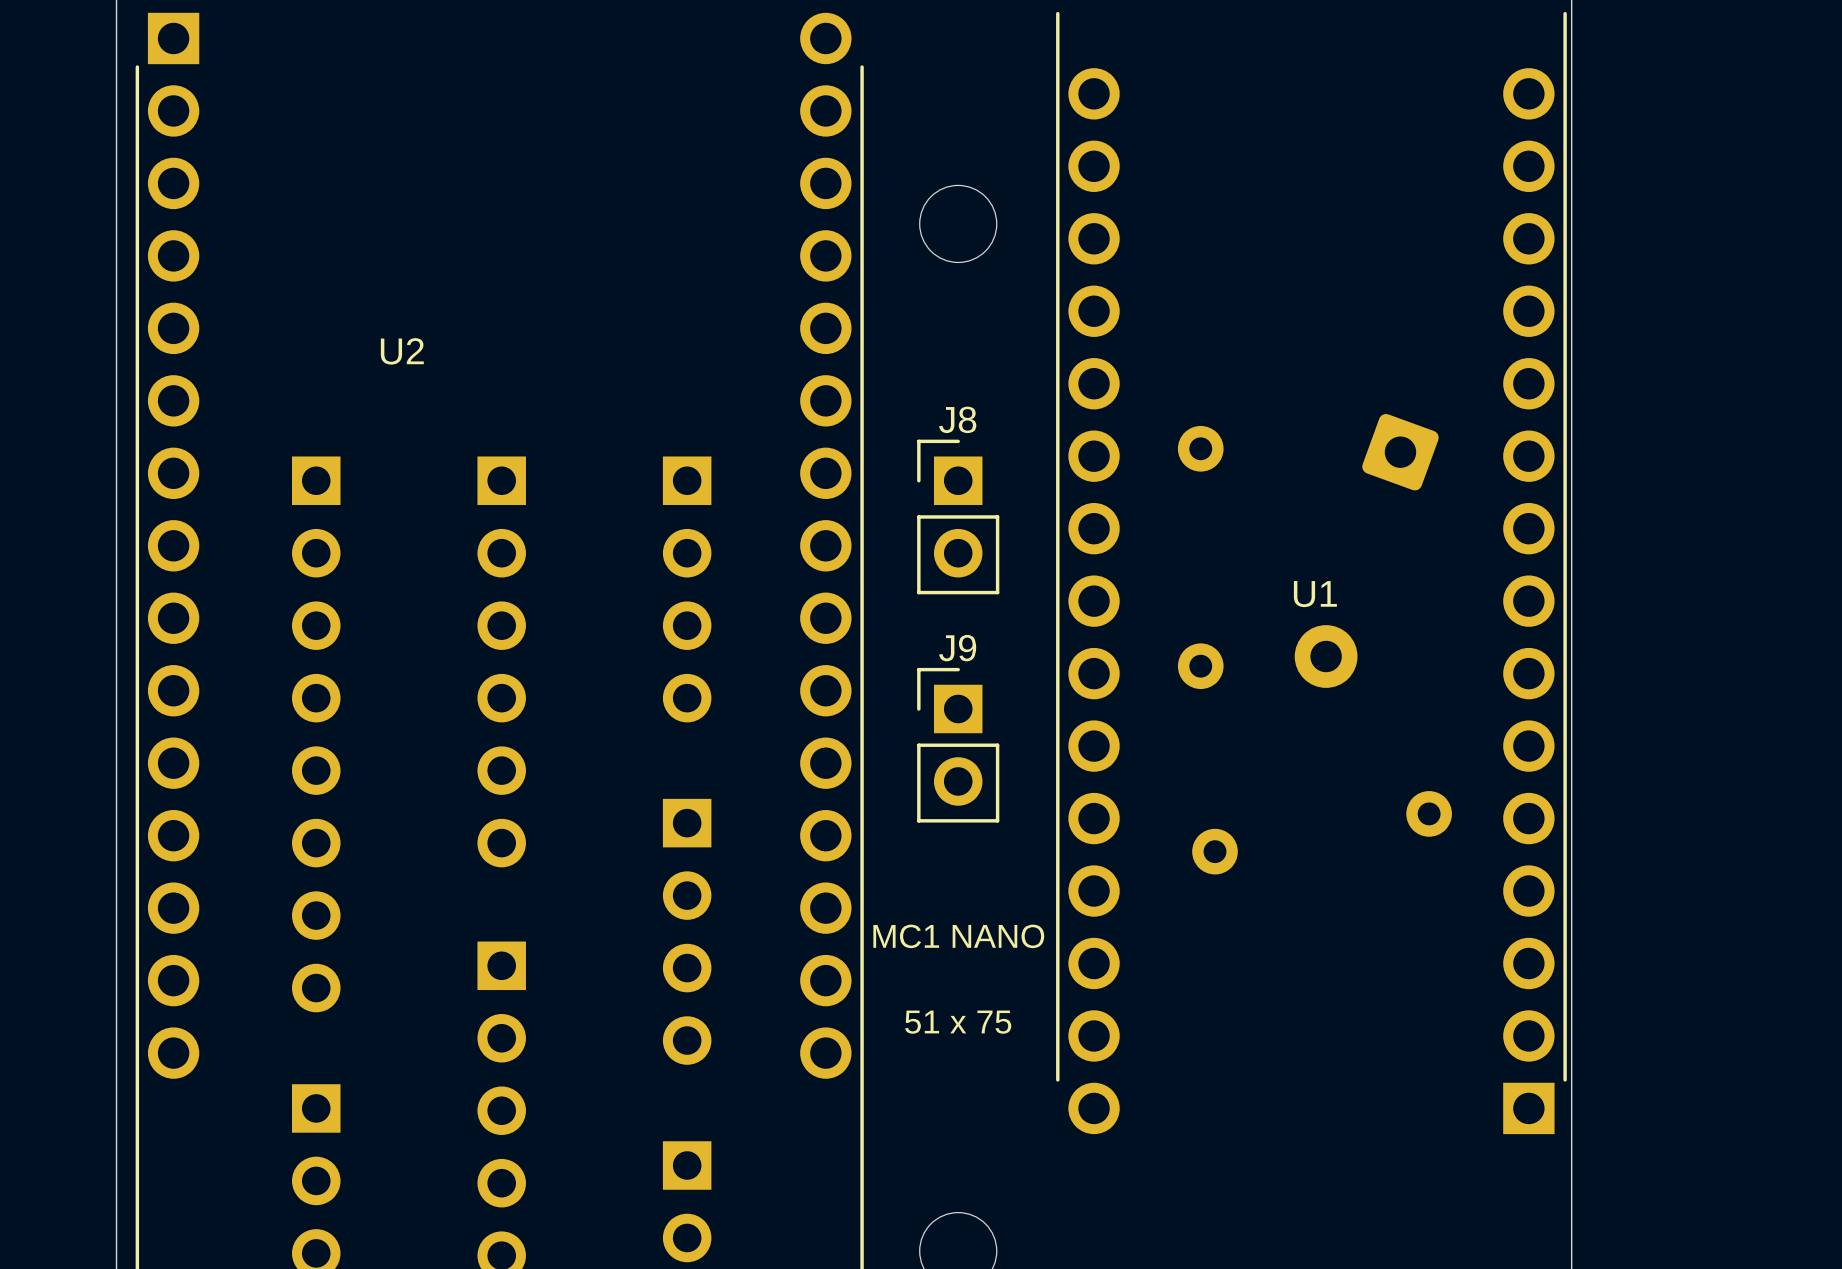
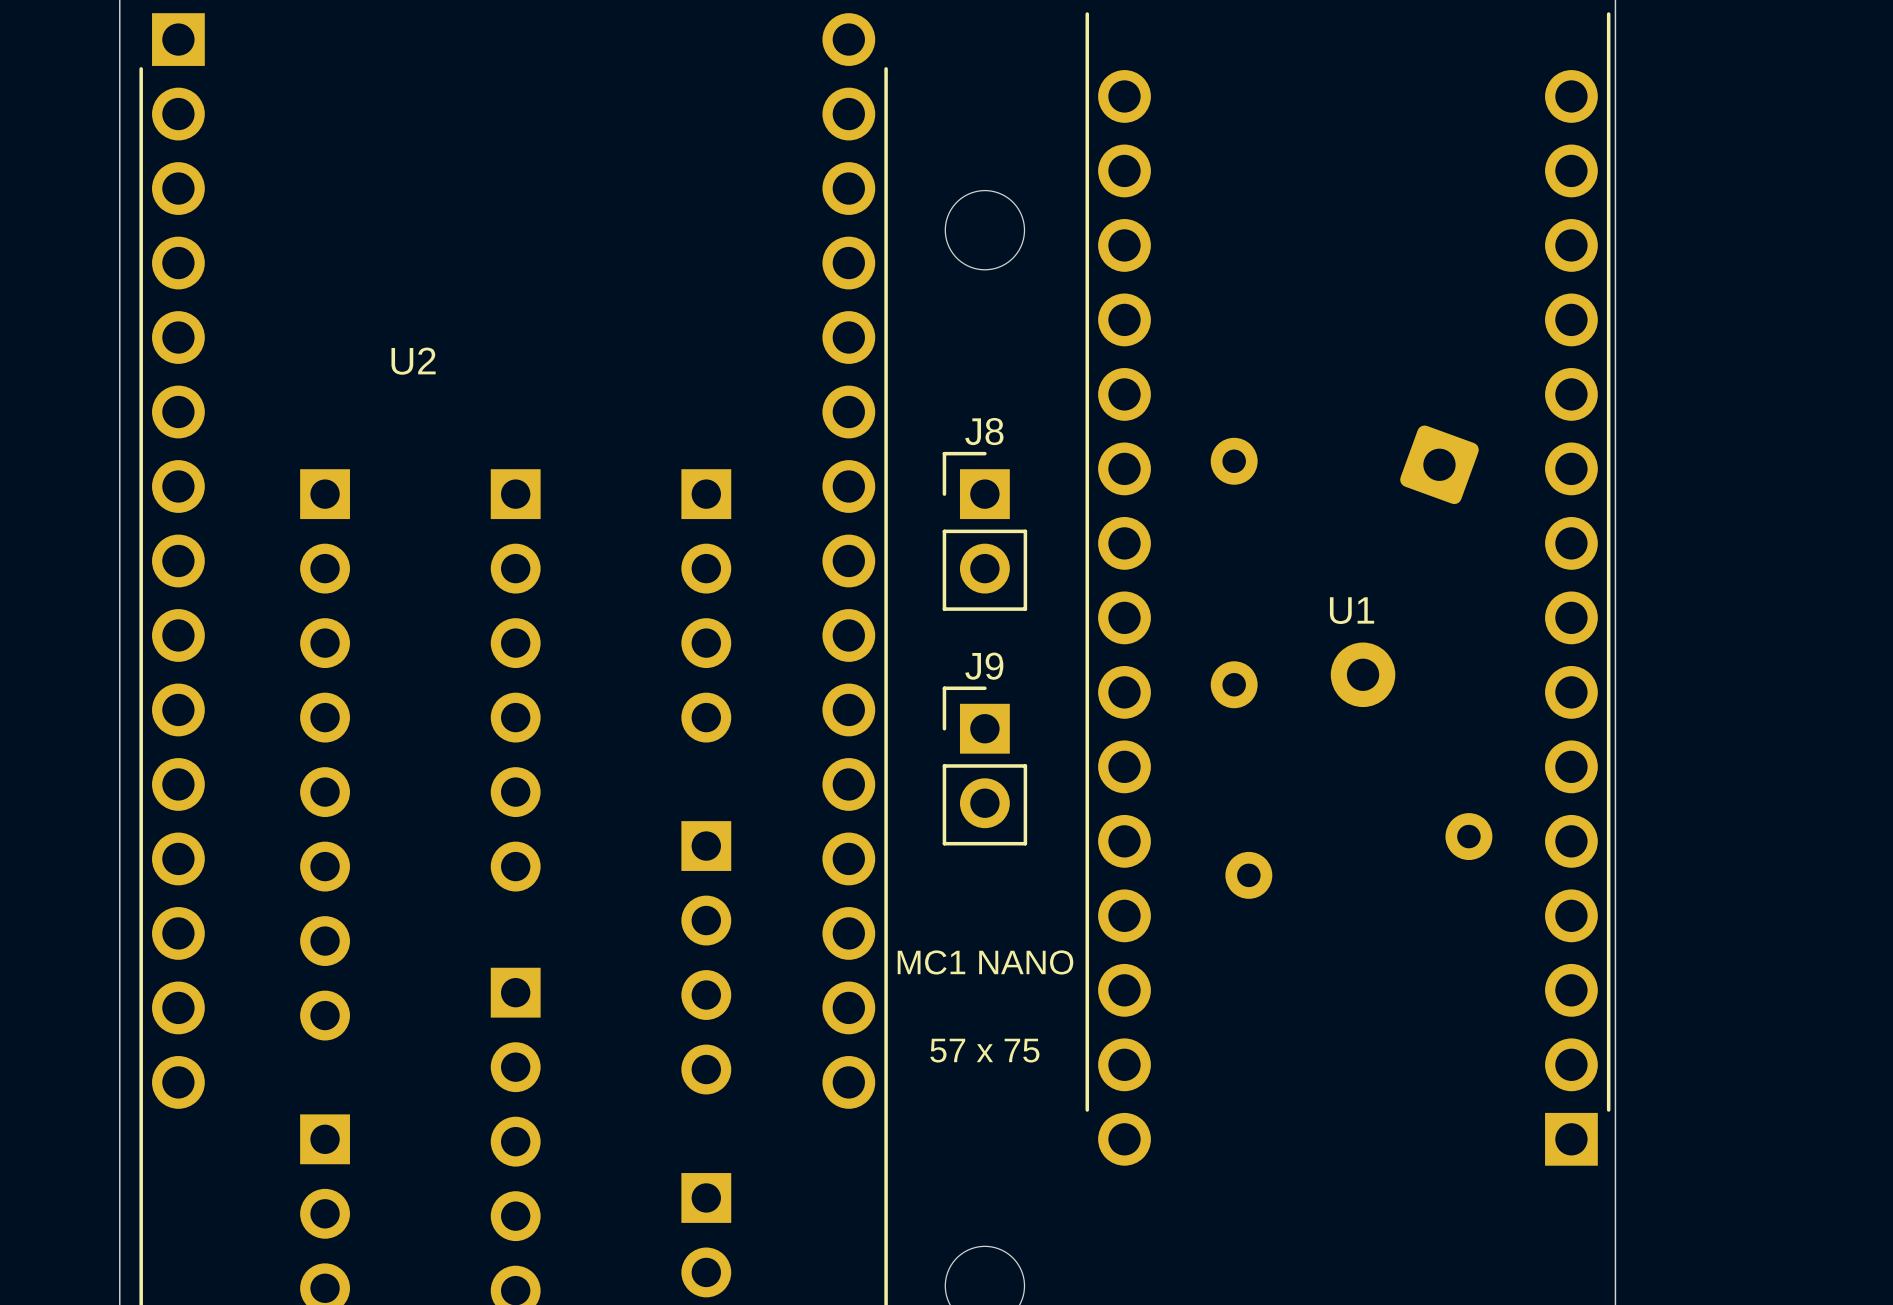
text: 51 x 75 (958, 1022) -> 57 x 75 (984, 1050)

